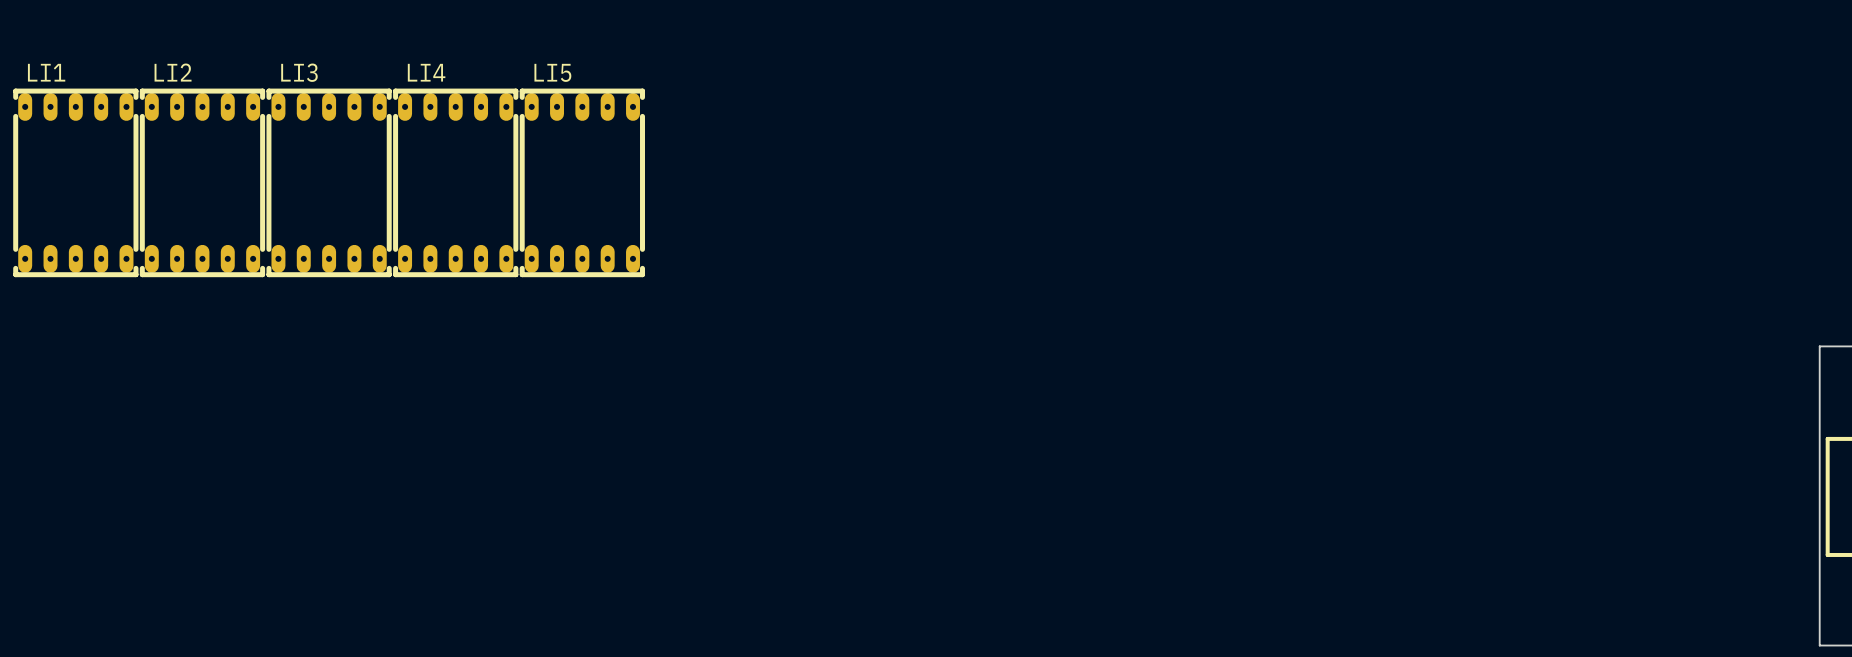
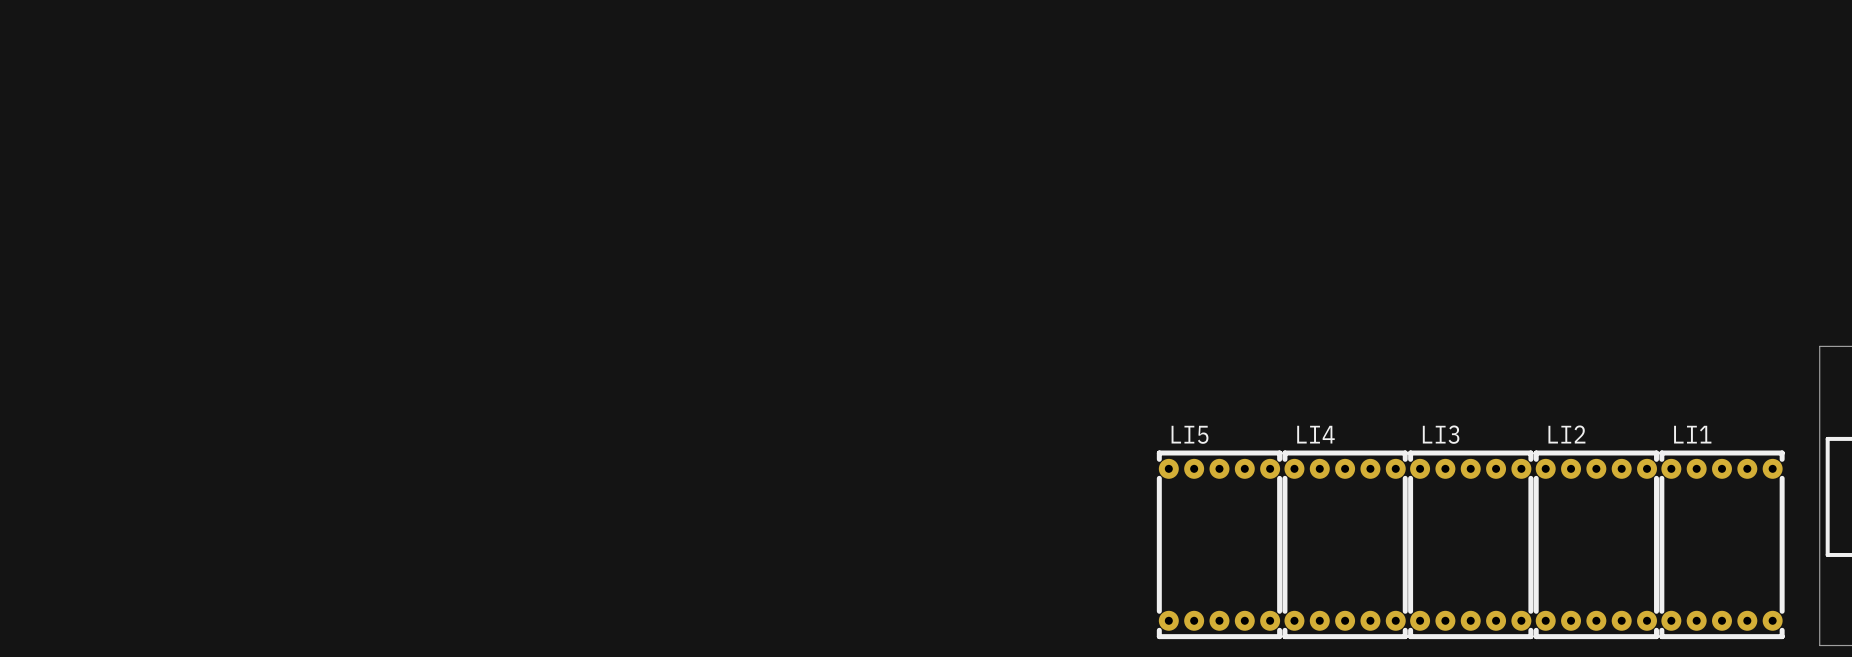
LI1 footprint: [13, 88, 139, 278] -> [1659, 450, 1785, 640]
LI2 footprint: [139, 88, 266, 278] -> [1533, 450, 1660, 640]
LI3 footprint: [266, 88, 392, 278] -> [1408, 450, 1534, 640]
LI4 footprint: [393, 88, 519, 278] -> [1282, 450, 1408, 640]
LI5 footprint: [519, 88, 645, 278] -> [1156, 450, 1283, 640]

